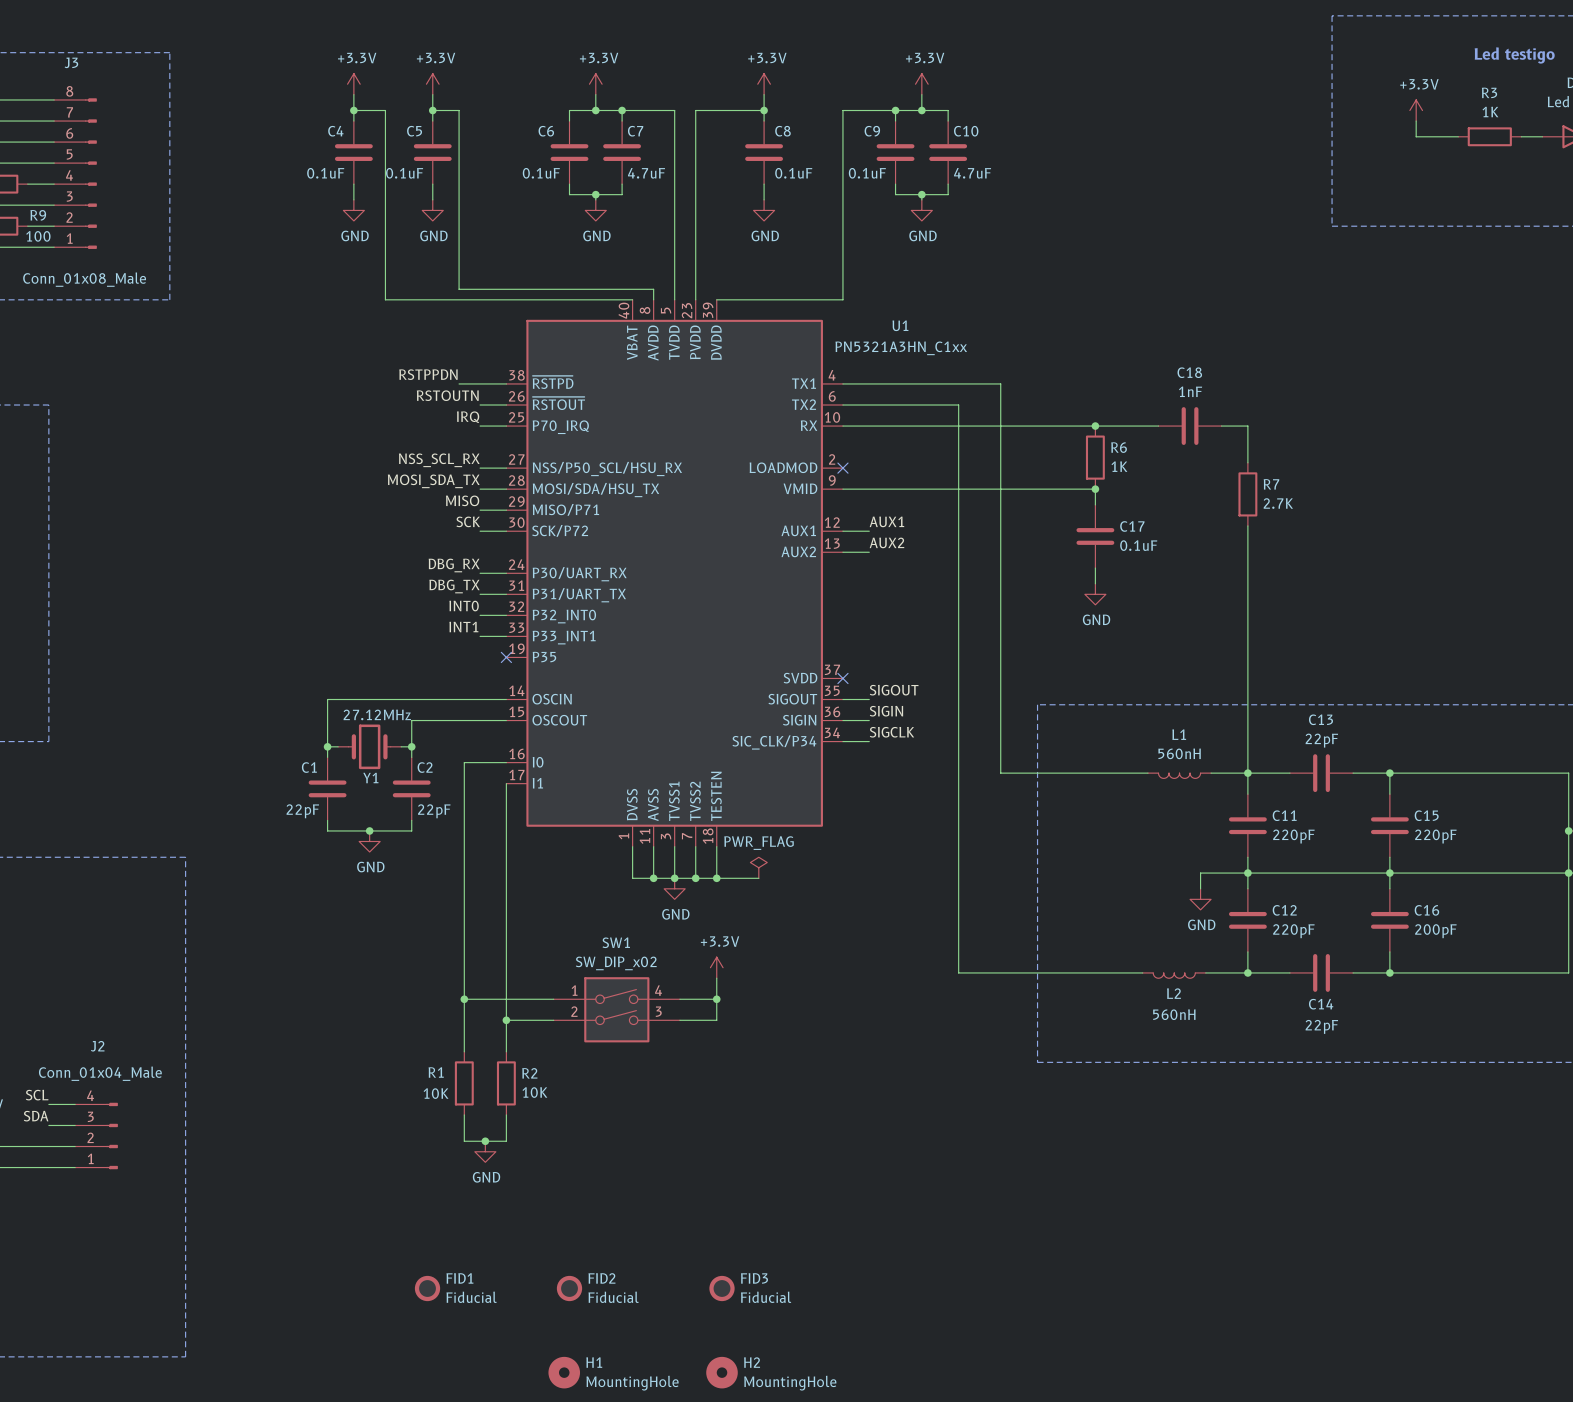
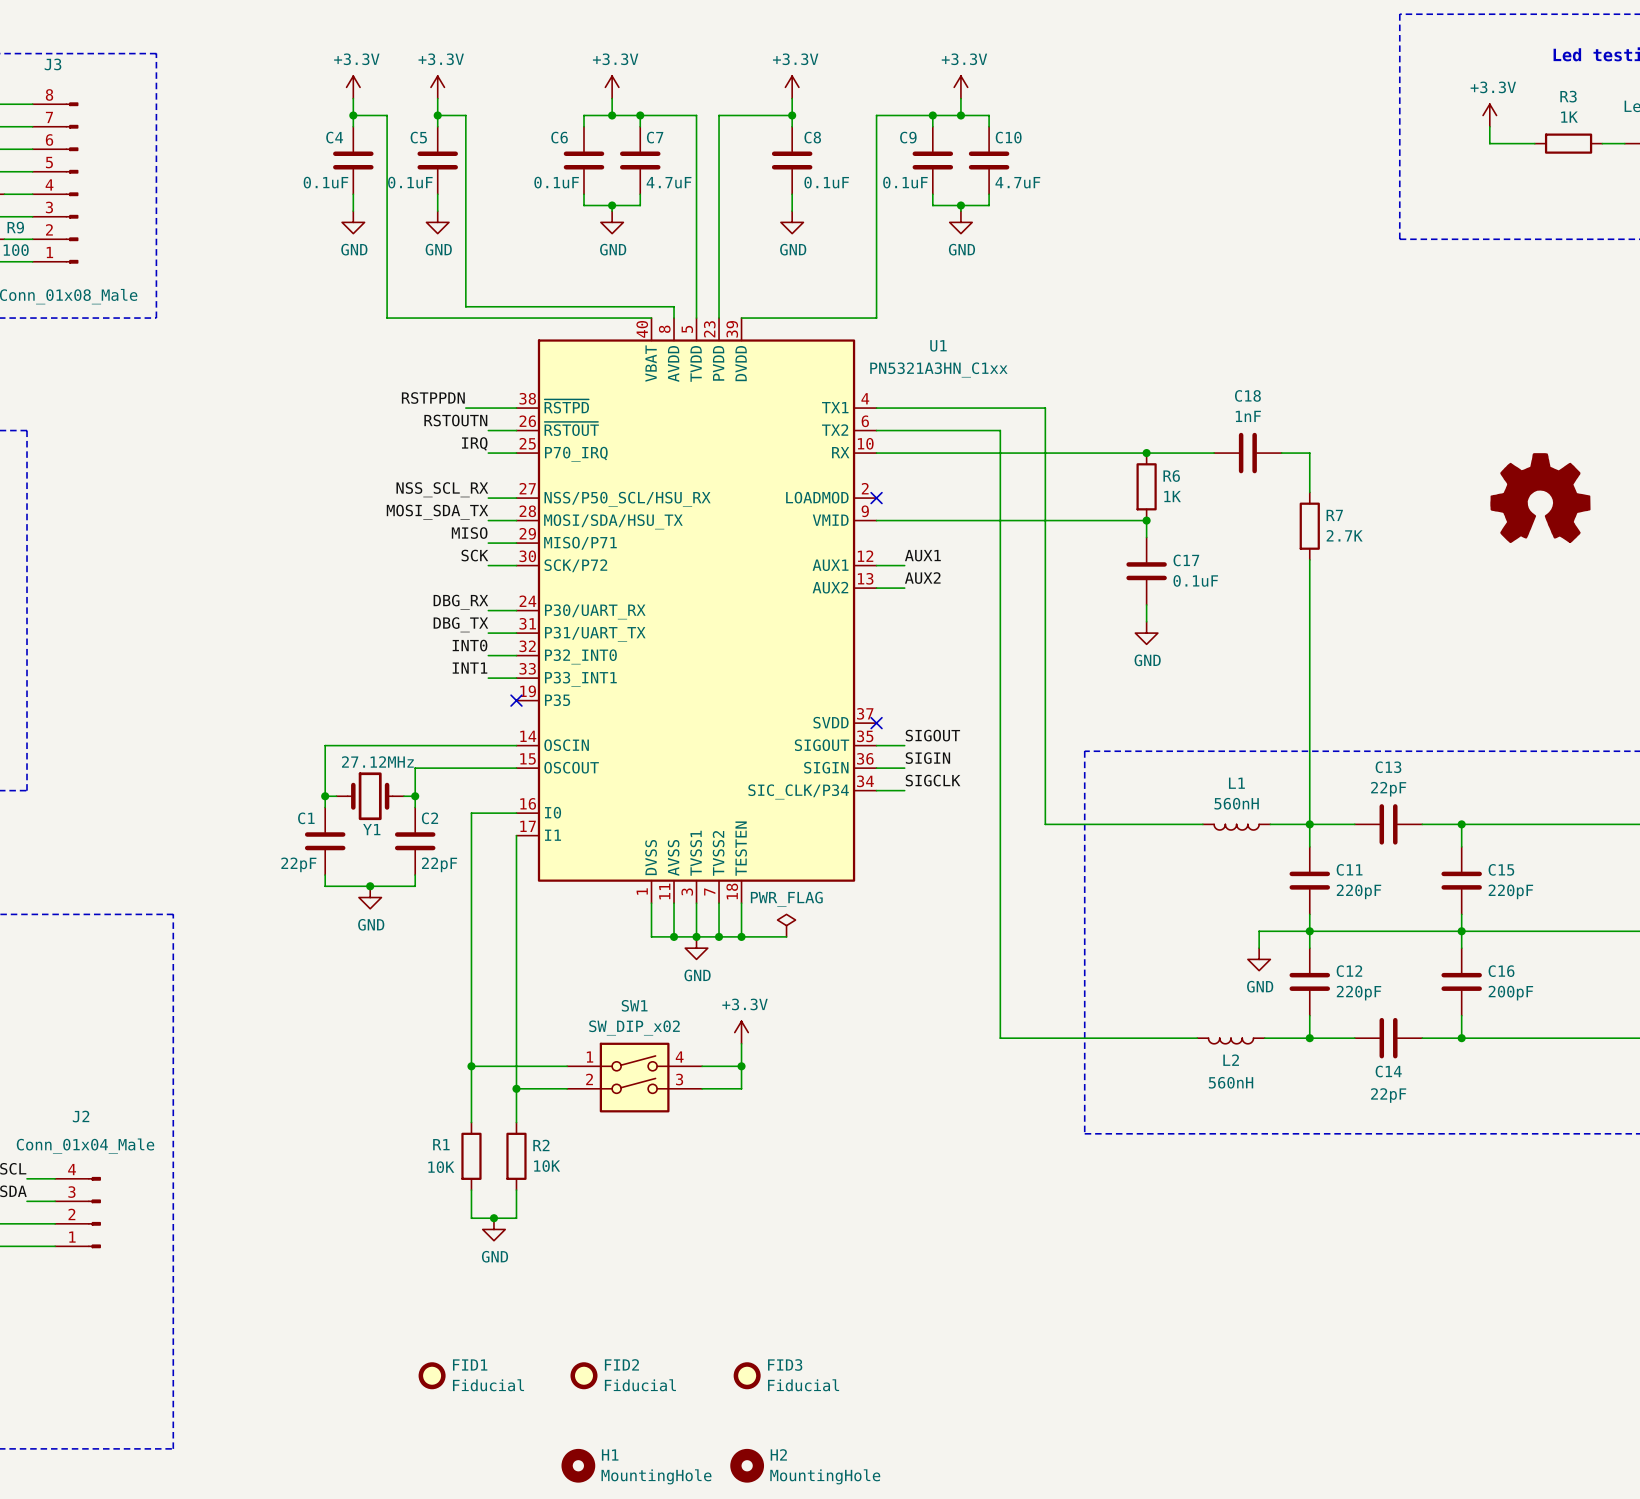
part: none -> (1540, 498)

